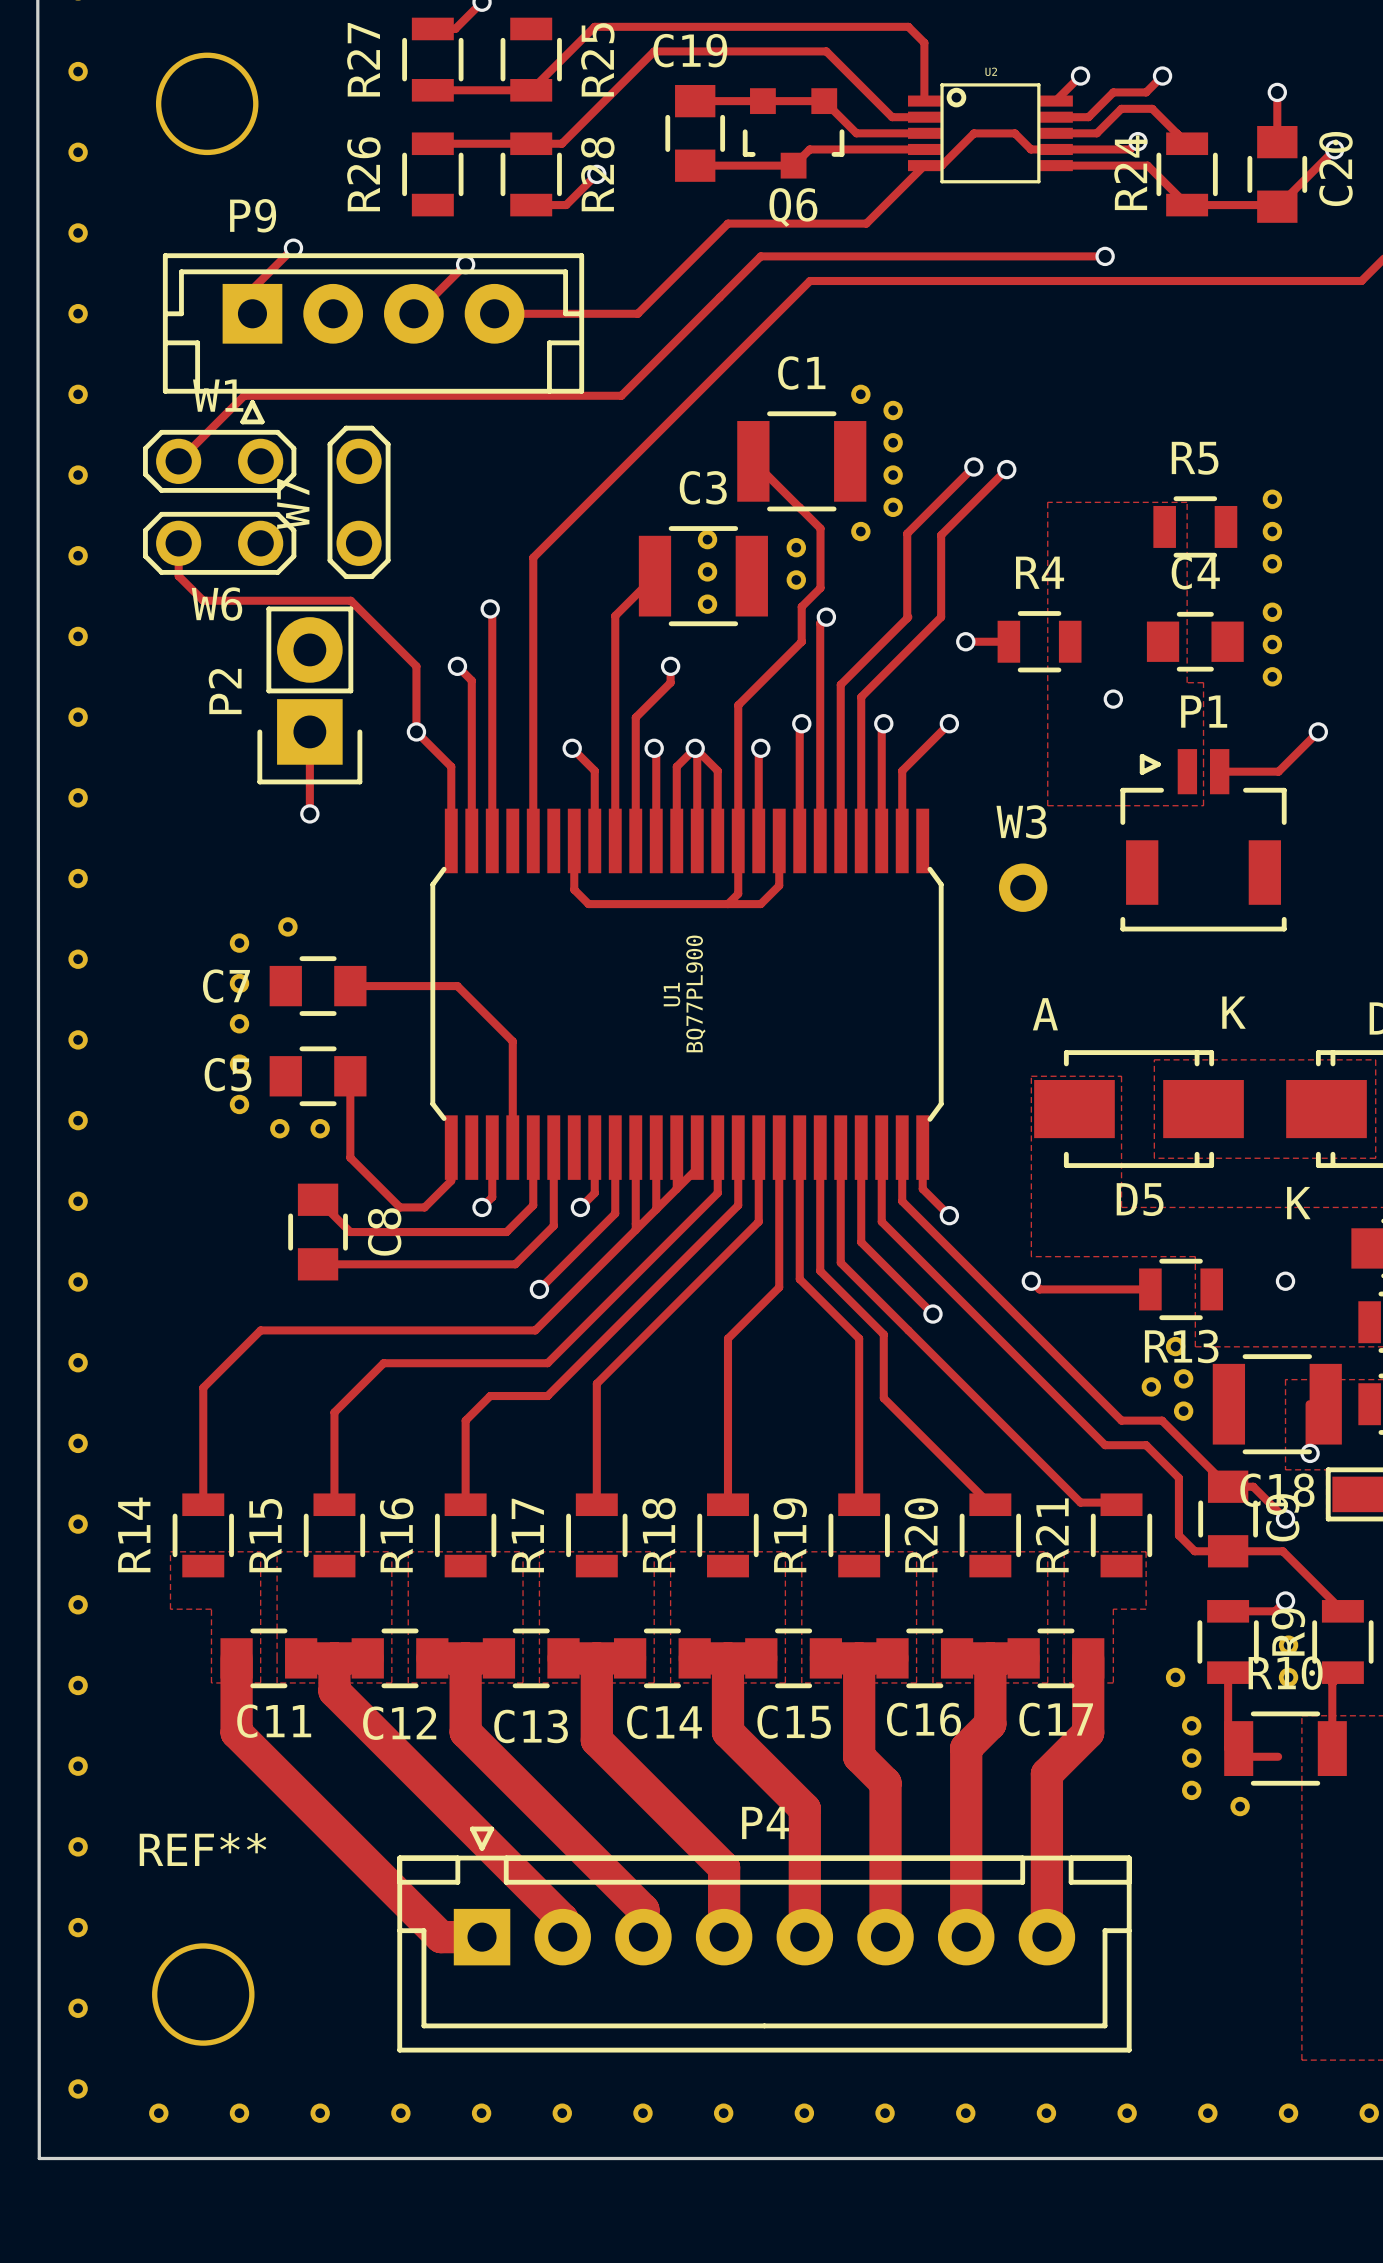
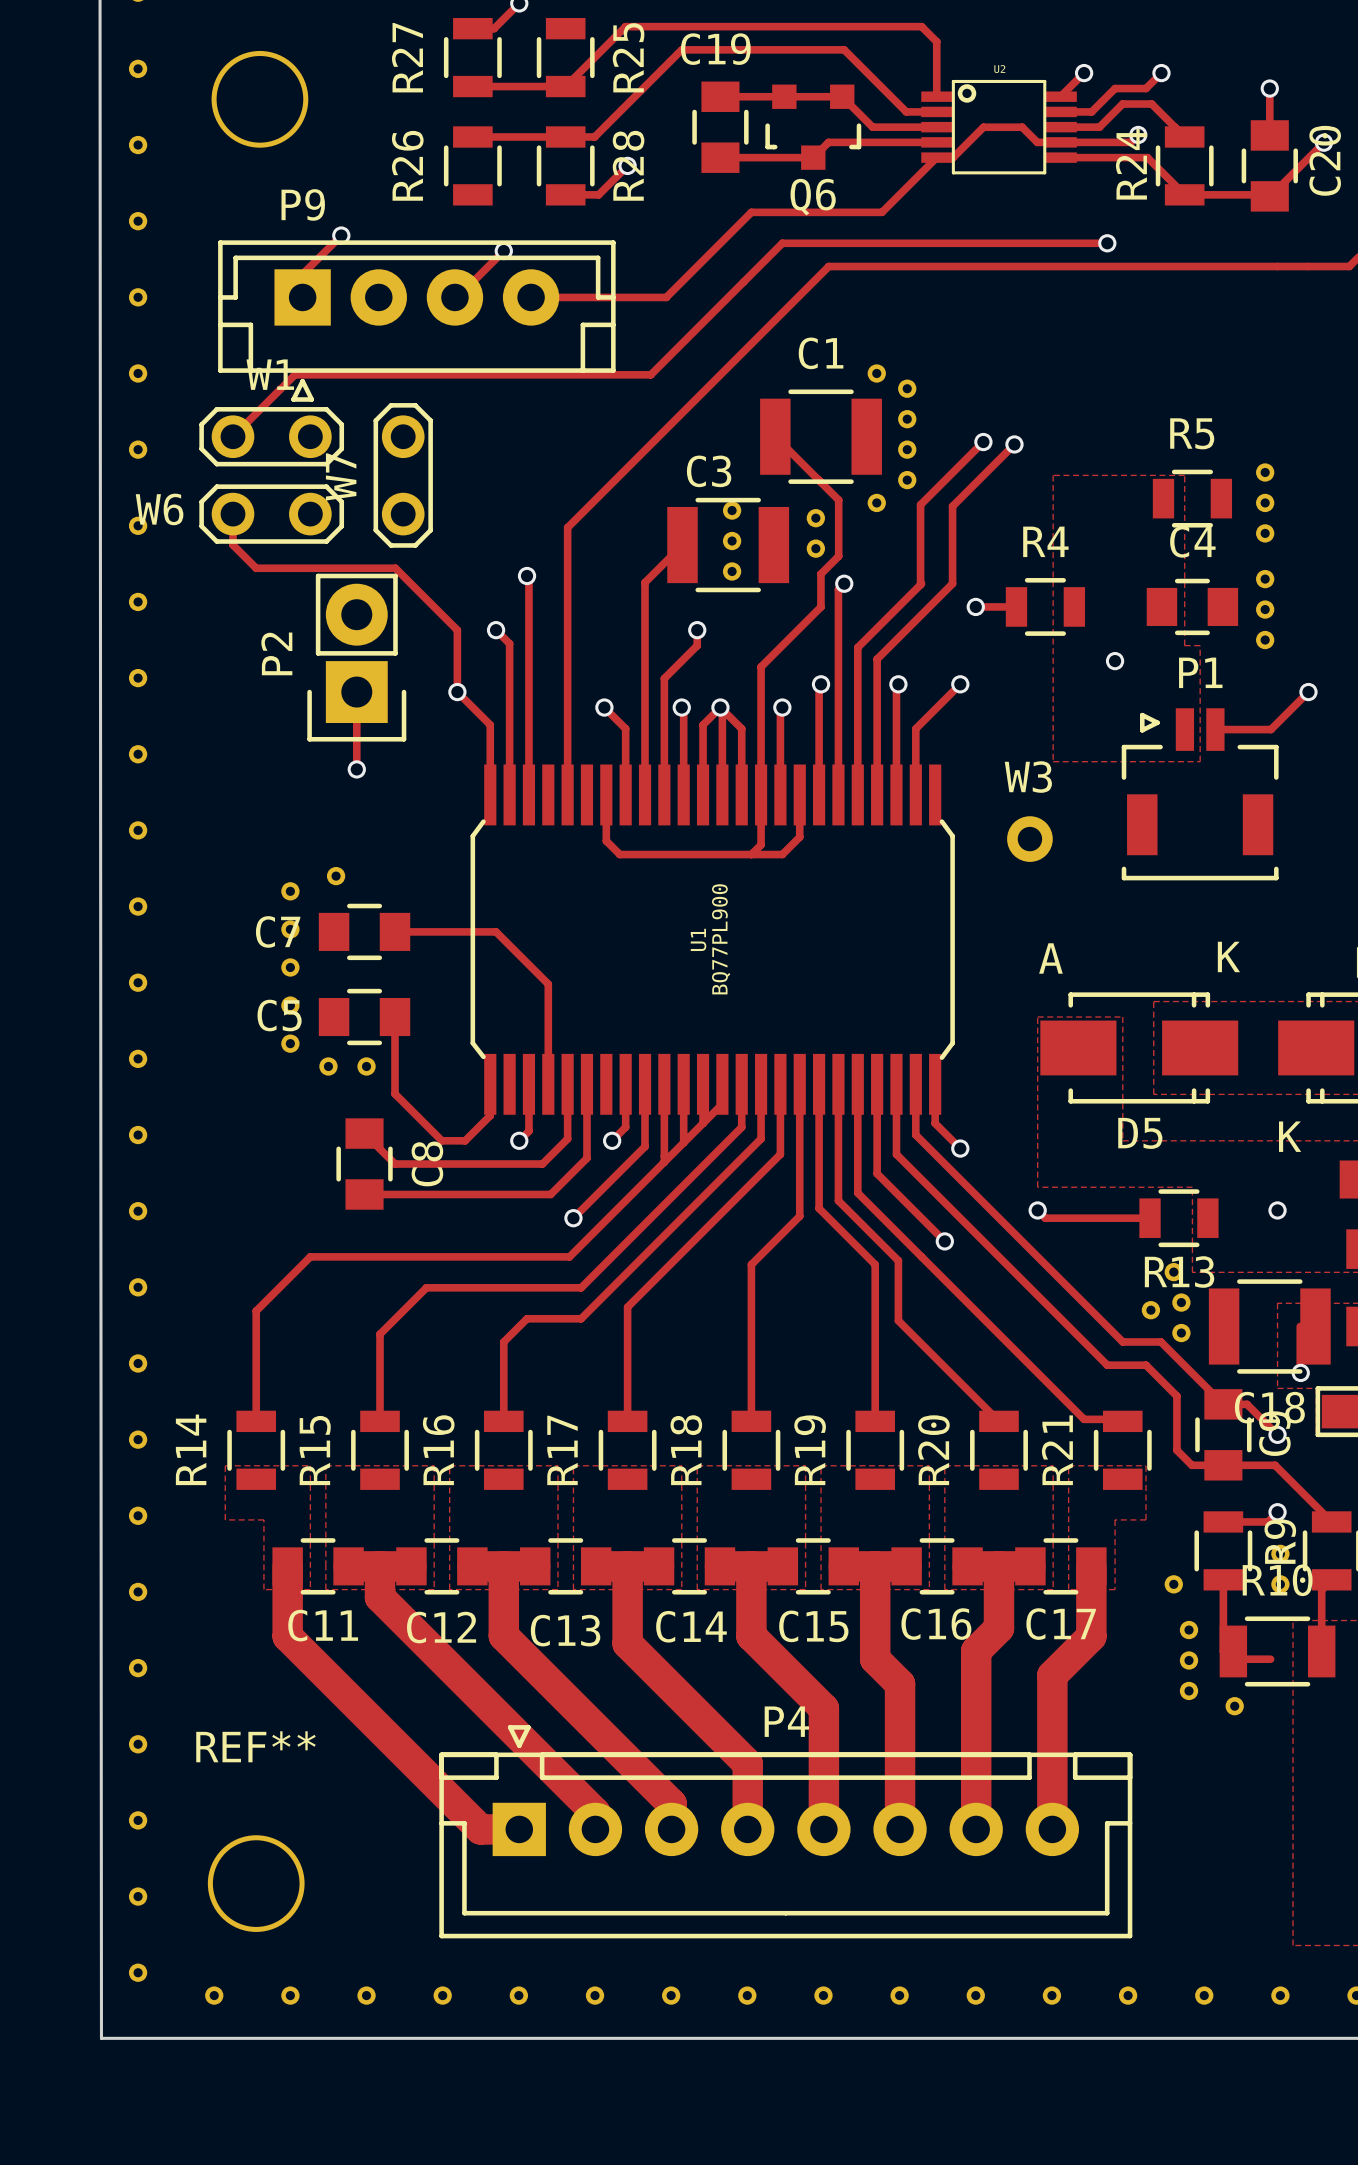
C3 name position: C3 (703, 487) -> C3 (709, 471)
W6 name position: W6 (217, 604) -> W6 (159, 509)

